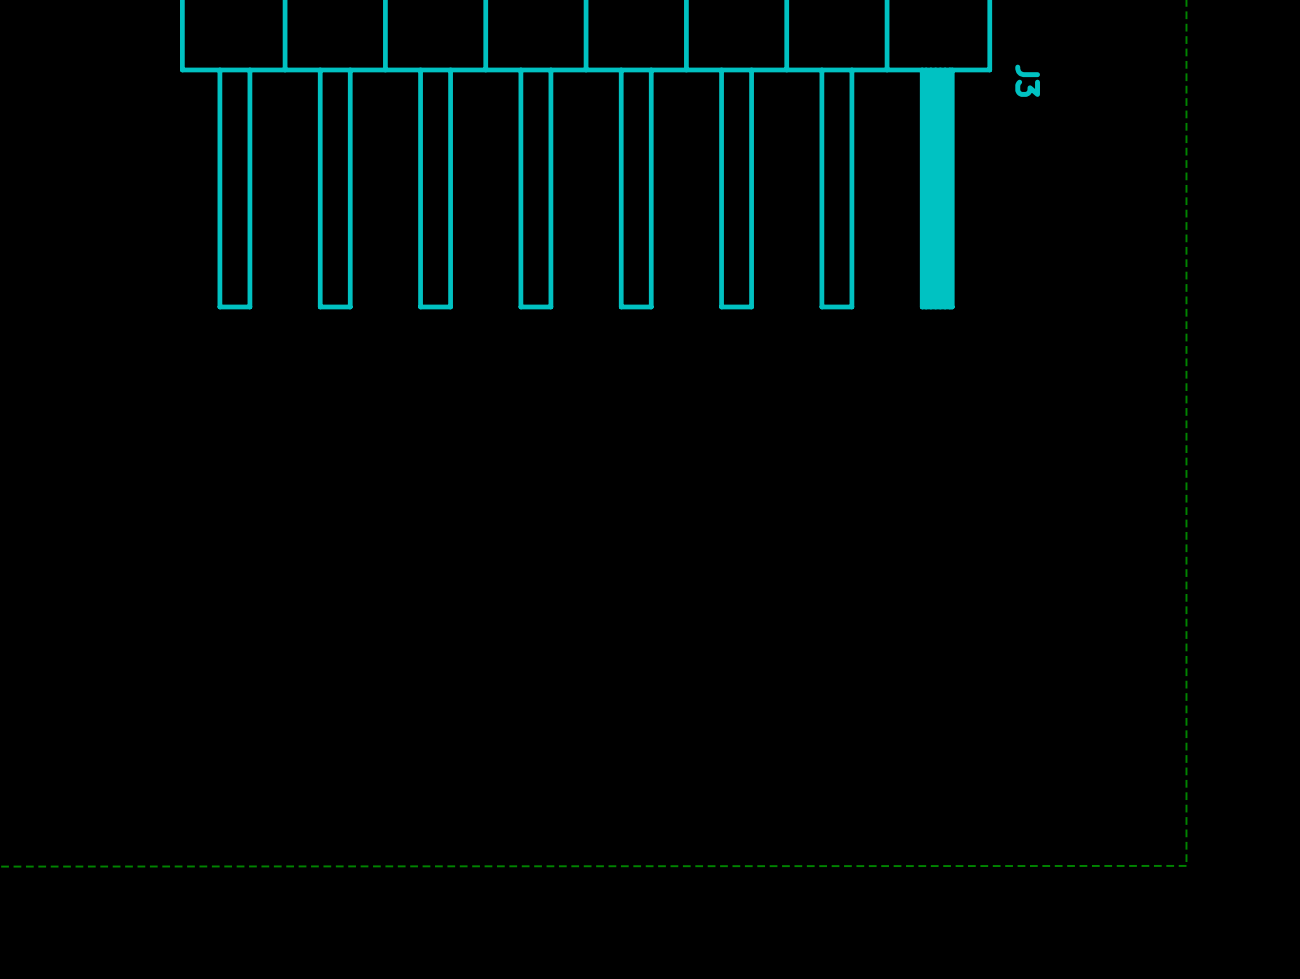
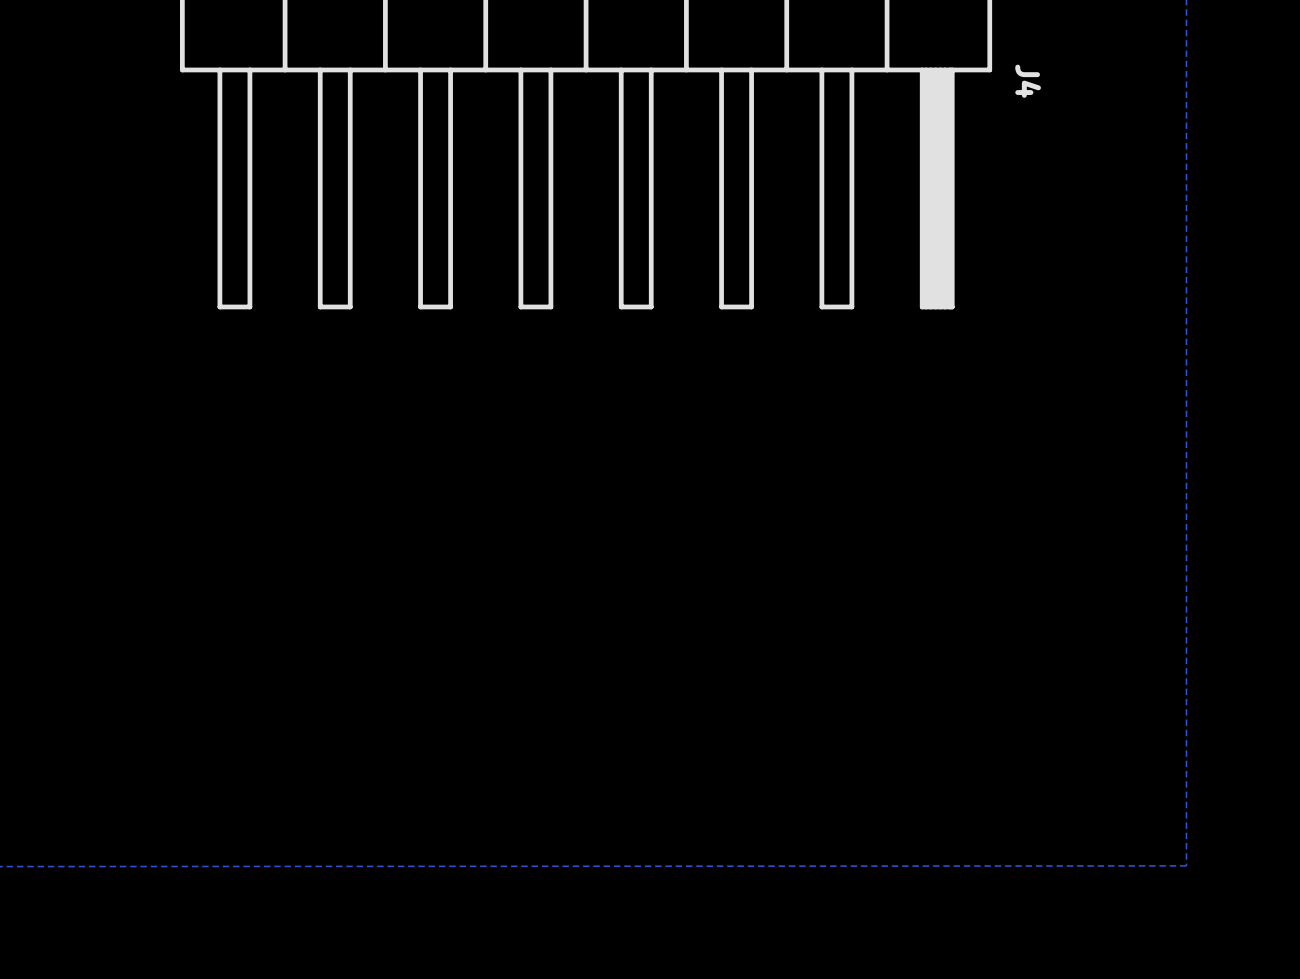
J3 name: J3 (1027, 80) -> J4 (1028, 81)

